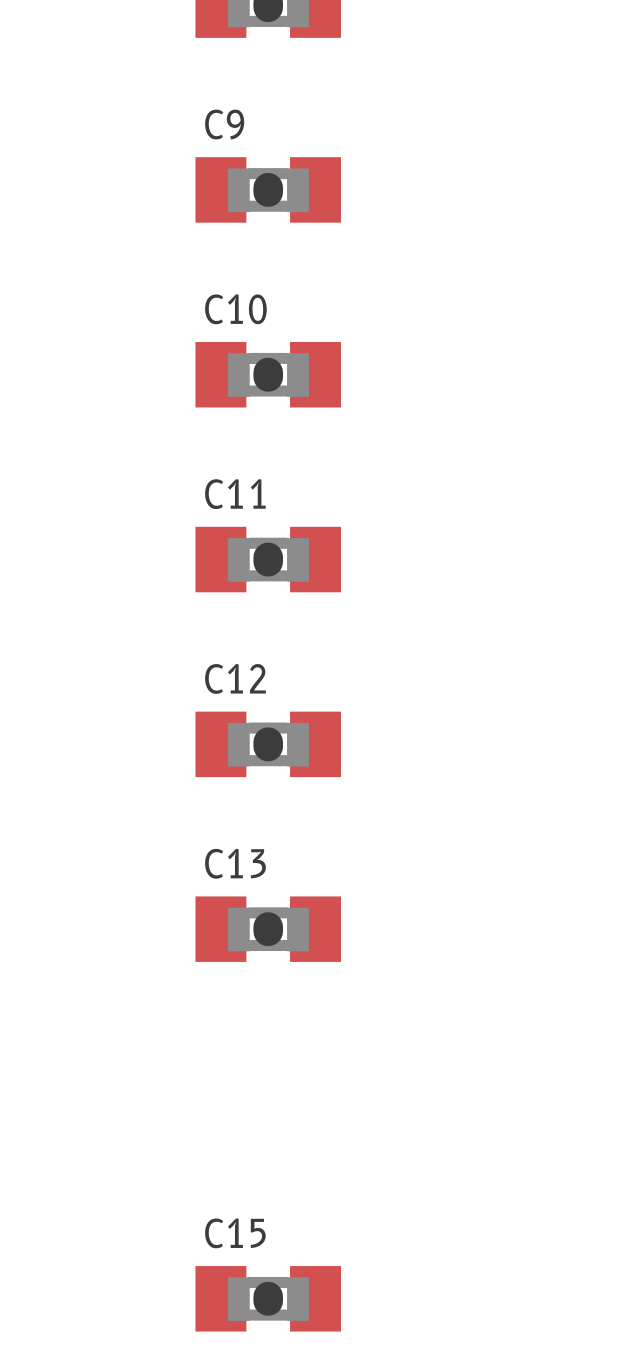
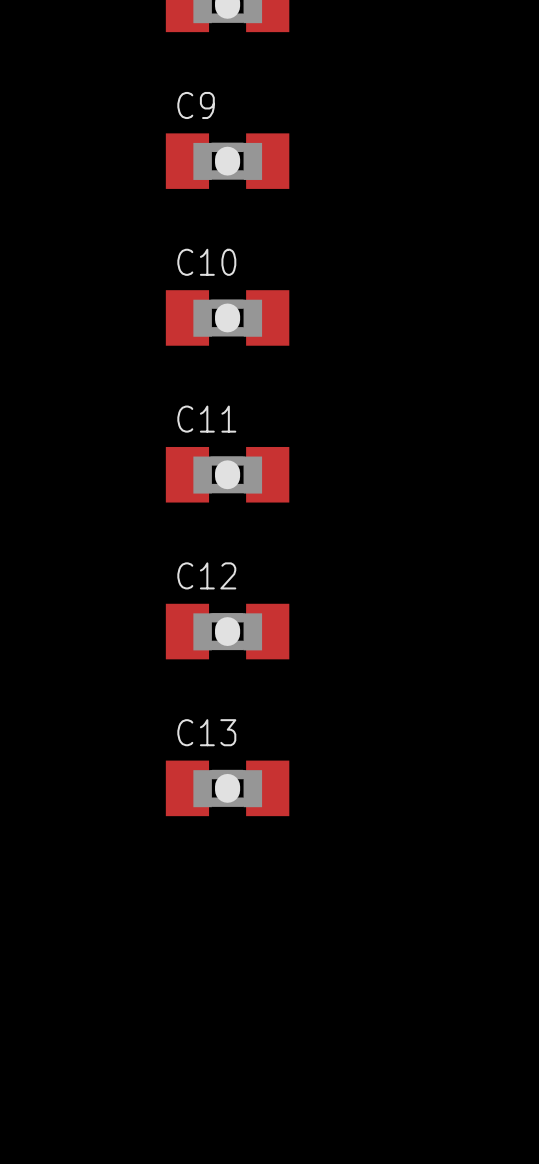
C15: (268, 1298) -> none

